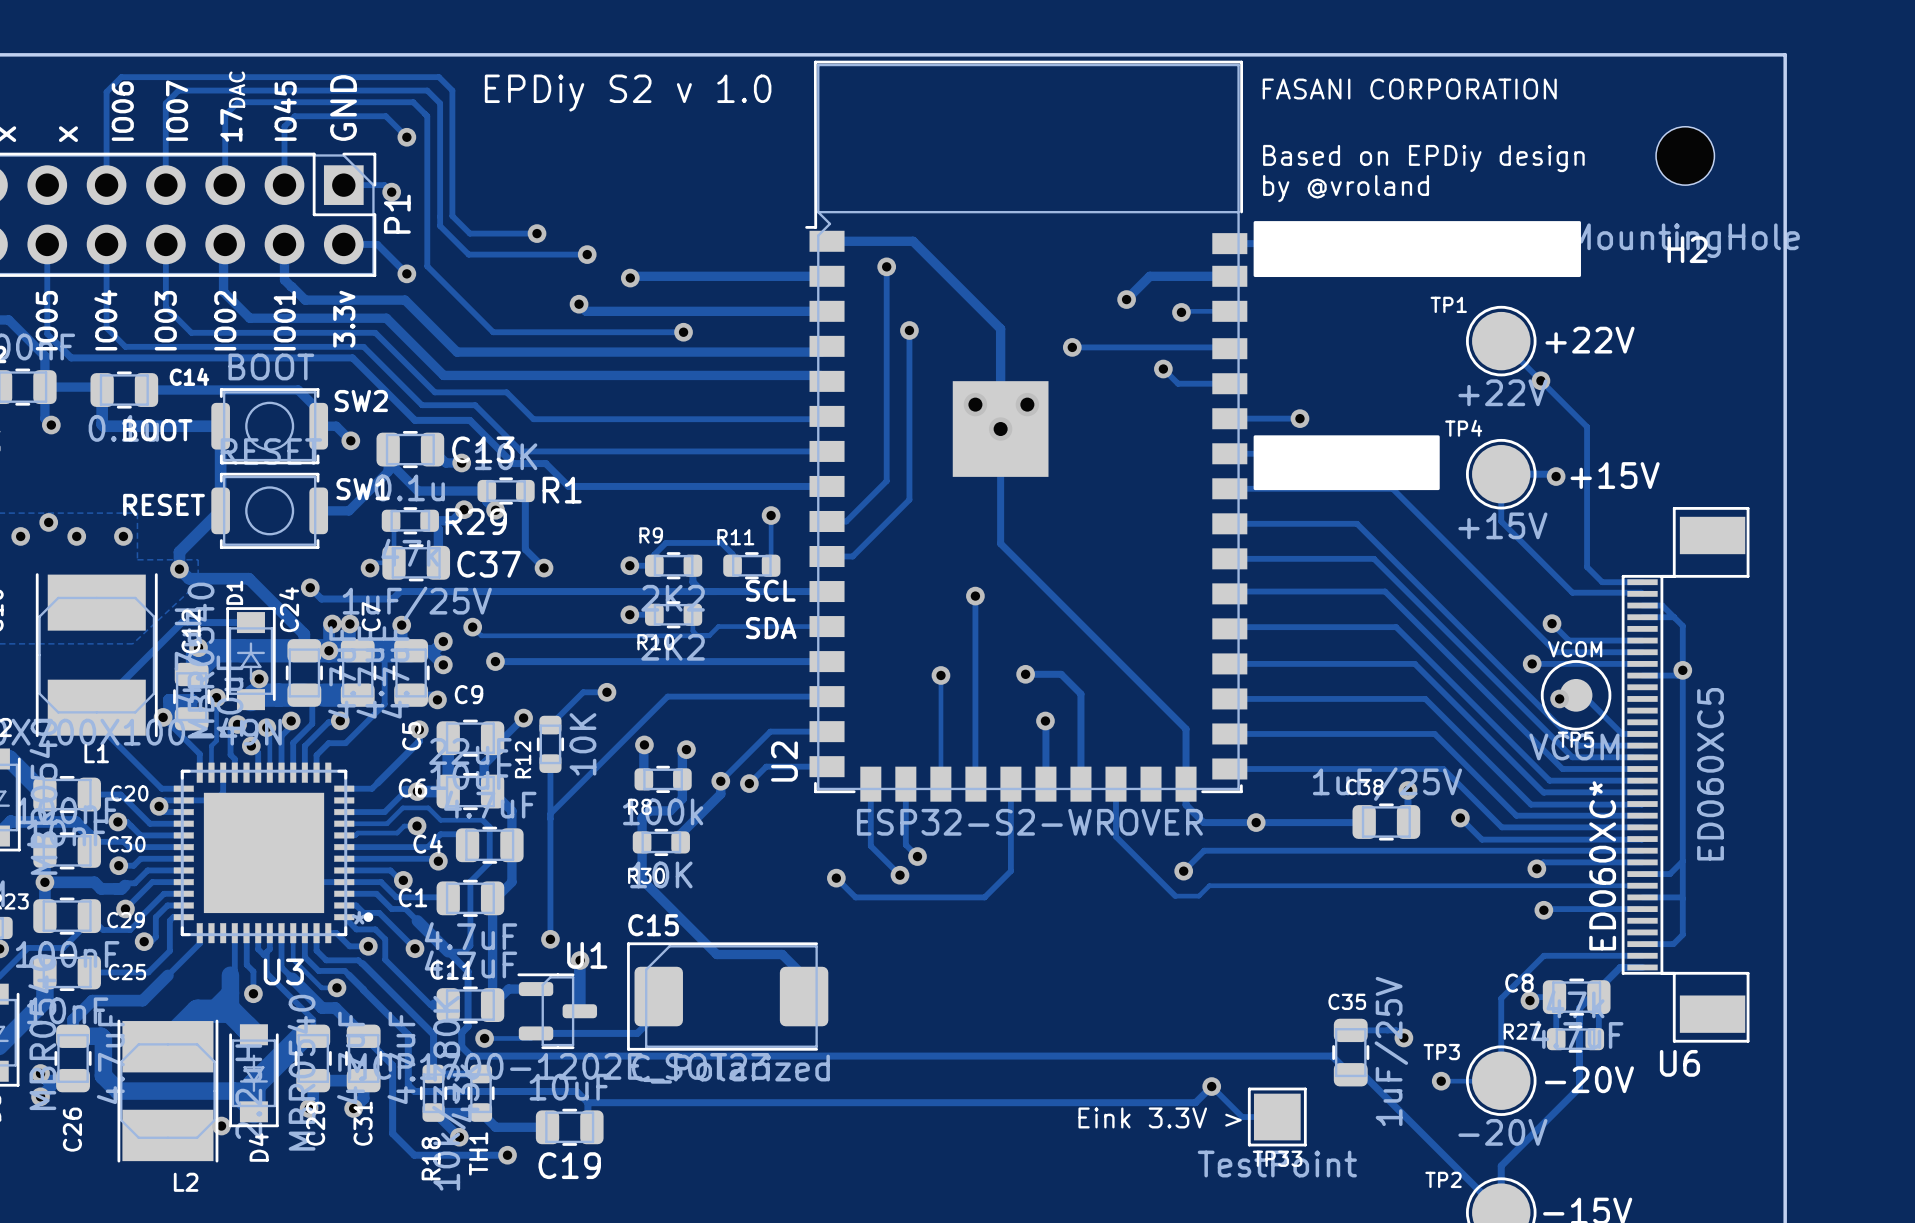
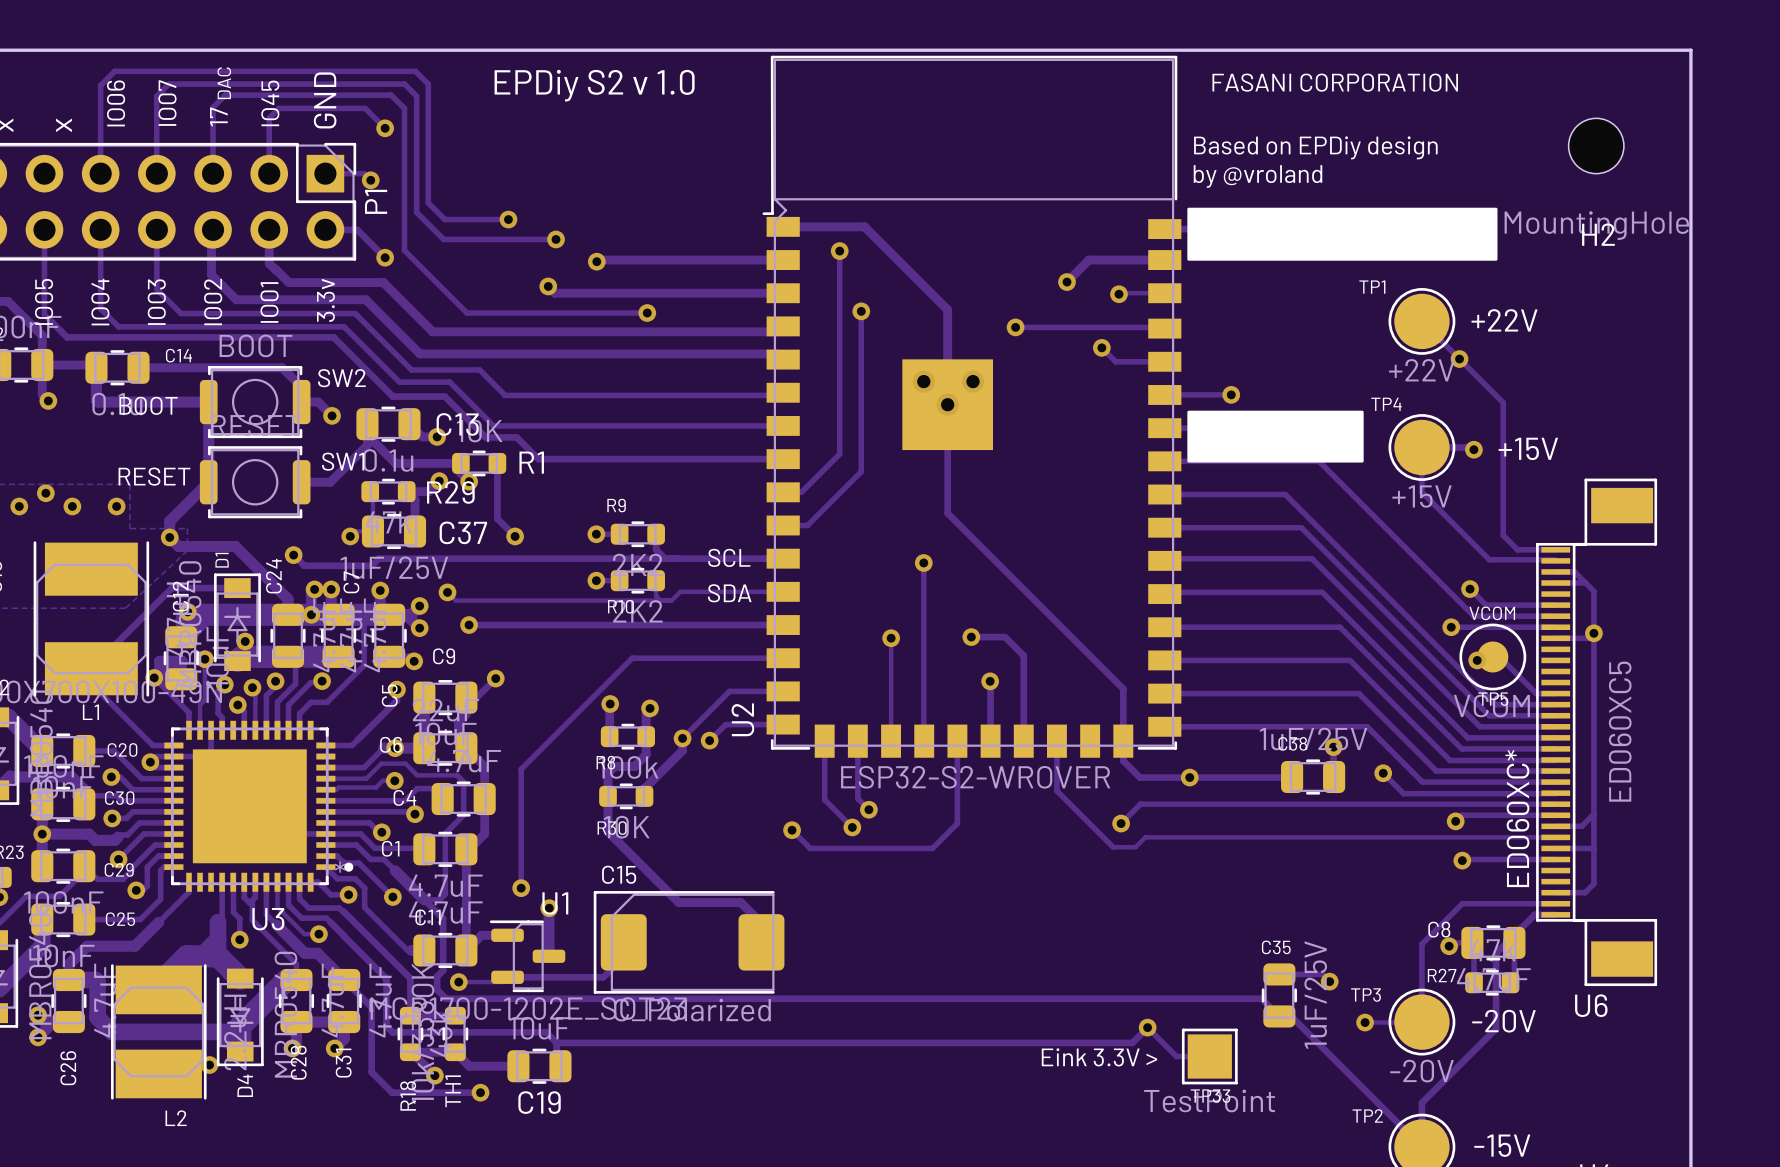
track: (771, 515) (771, 565) -> none
via: (771, 515) -> none
track: (654, 565) (654, 554) (666, 542) (721, 542) (732, 554) (732, 565) -> none
R11: (751, 565) -> none
track: (606, 692) (583, 692) (550, 725) -> none
via: (606, 692) -> none
R12: 10K (550, 744) -> none
track: (550, 763) (550, 813) -> none

